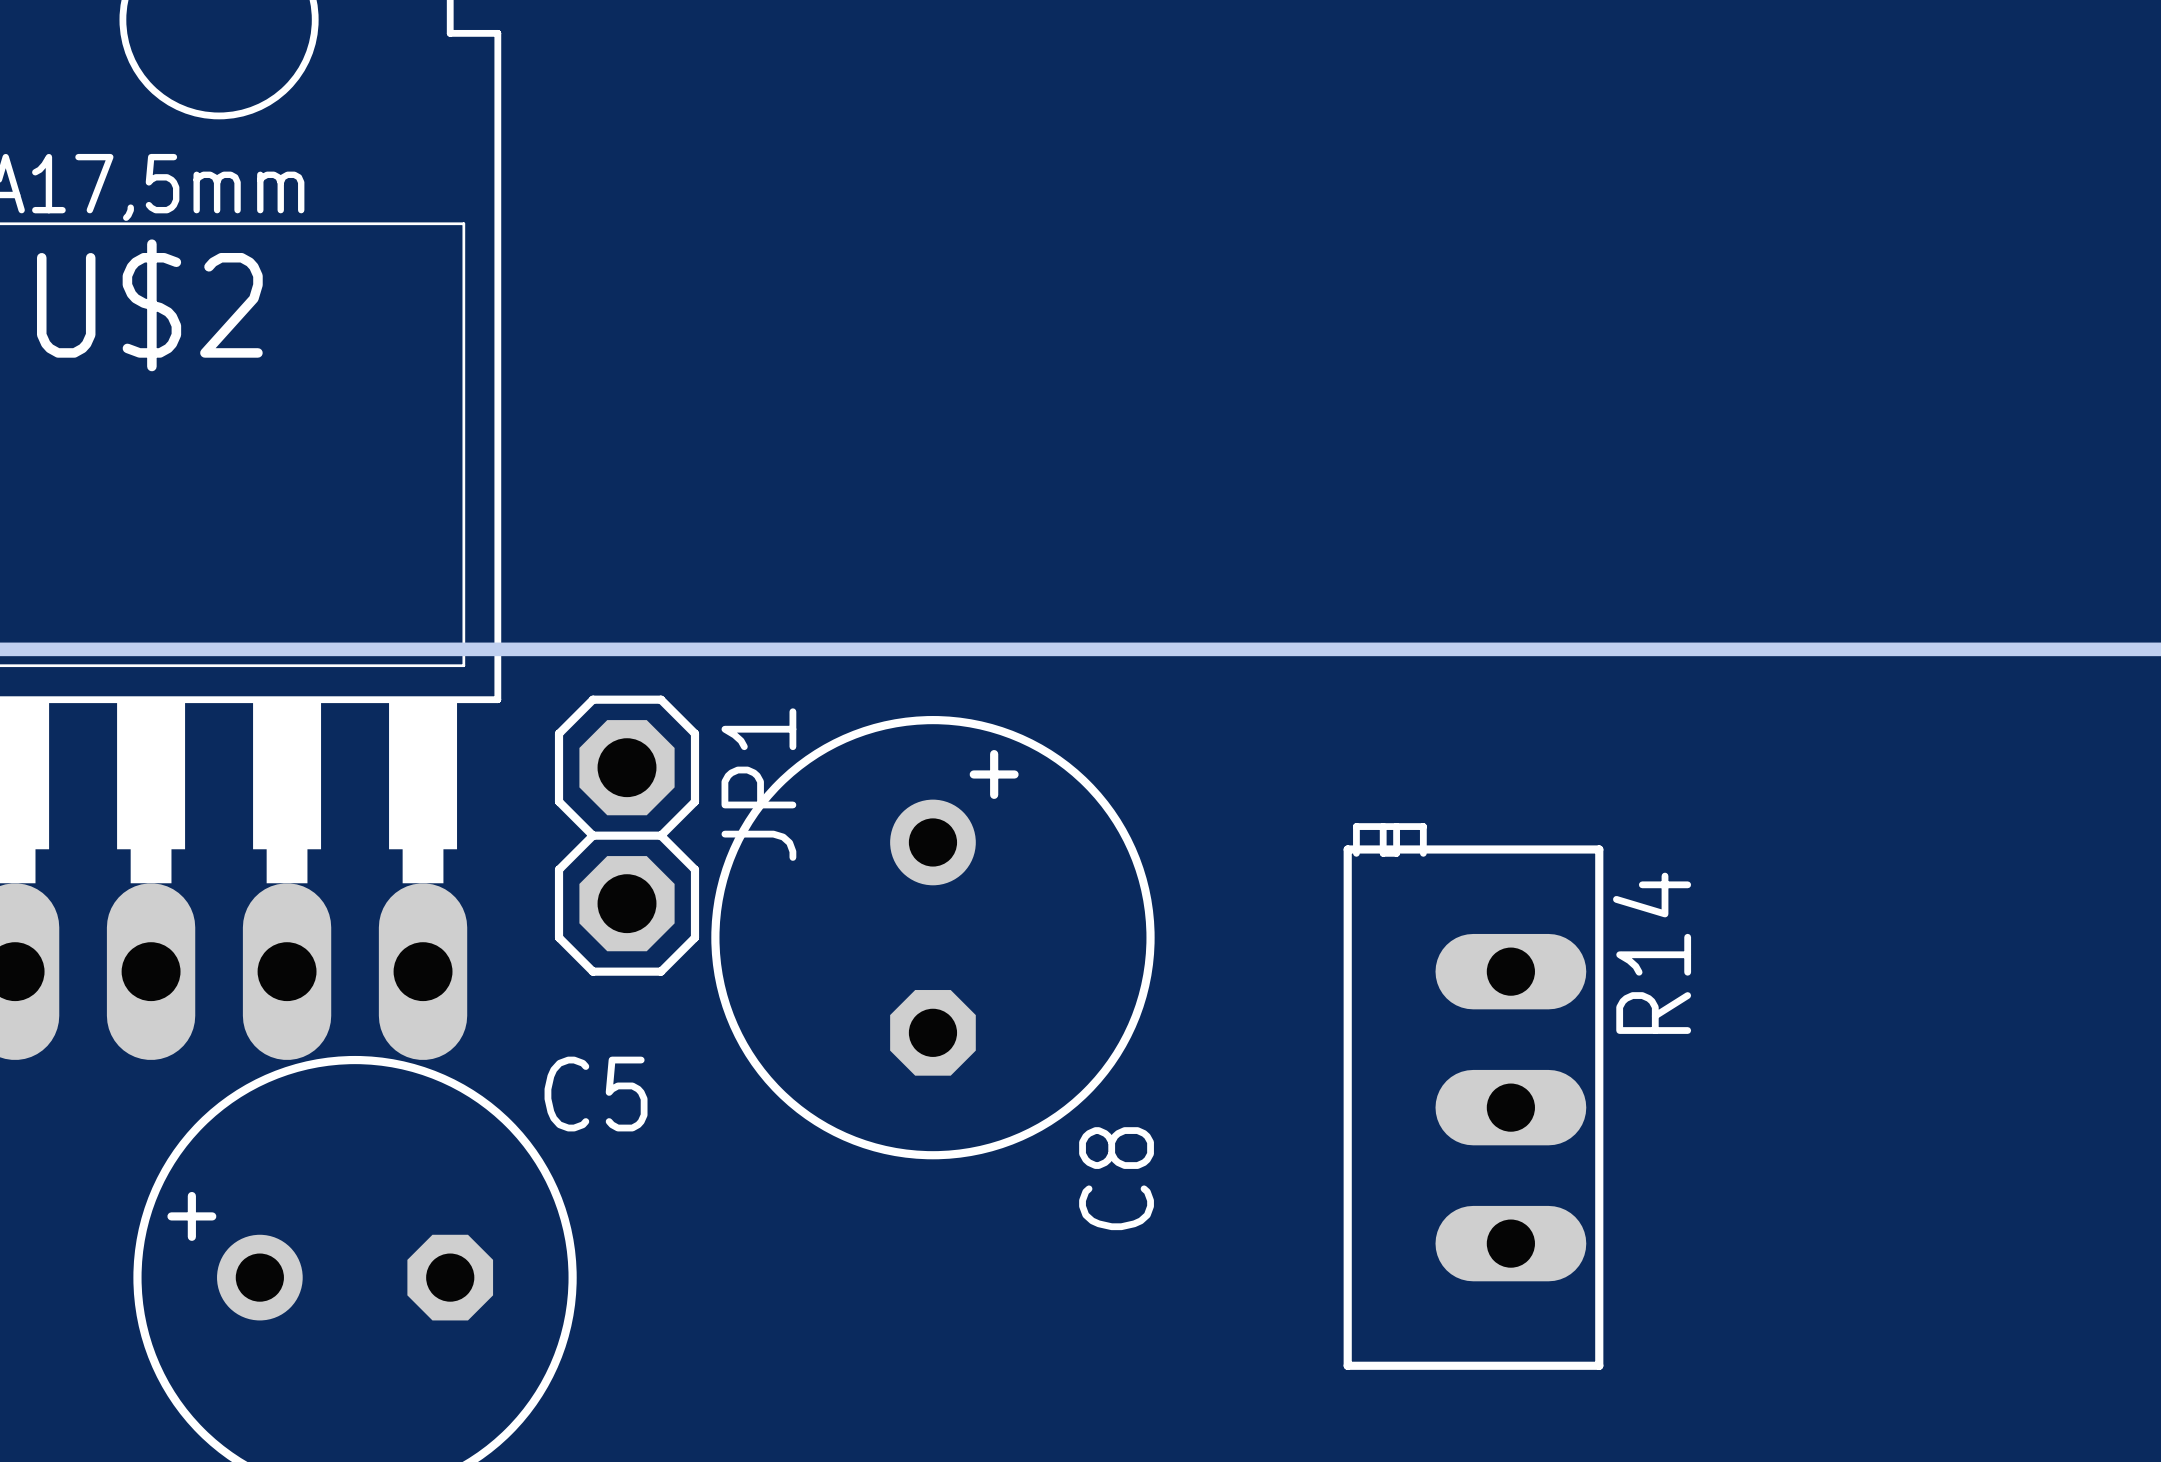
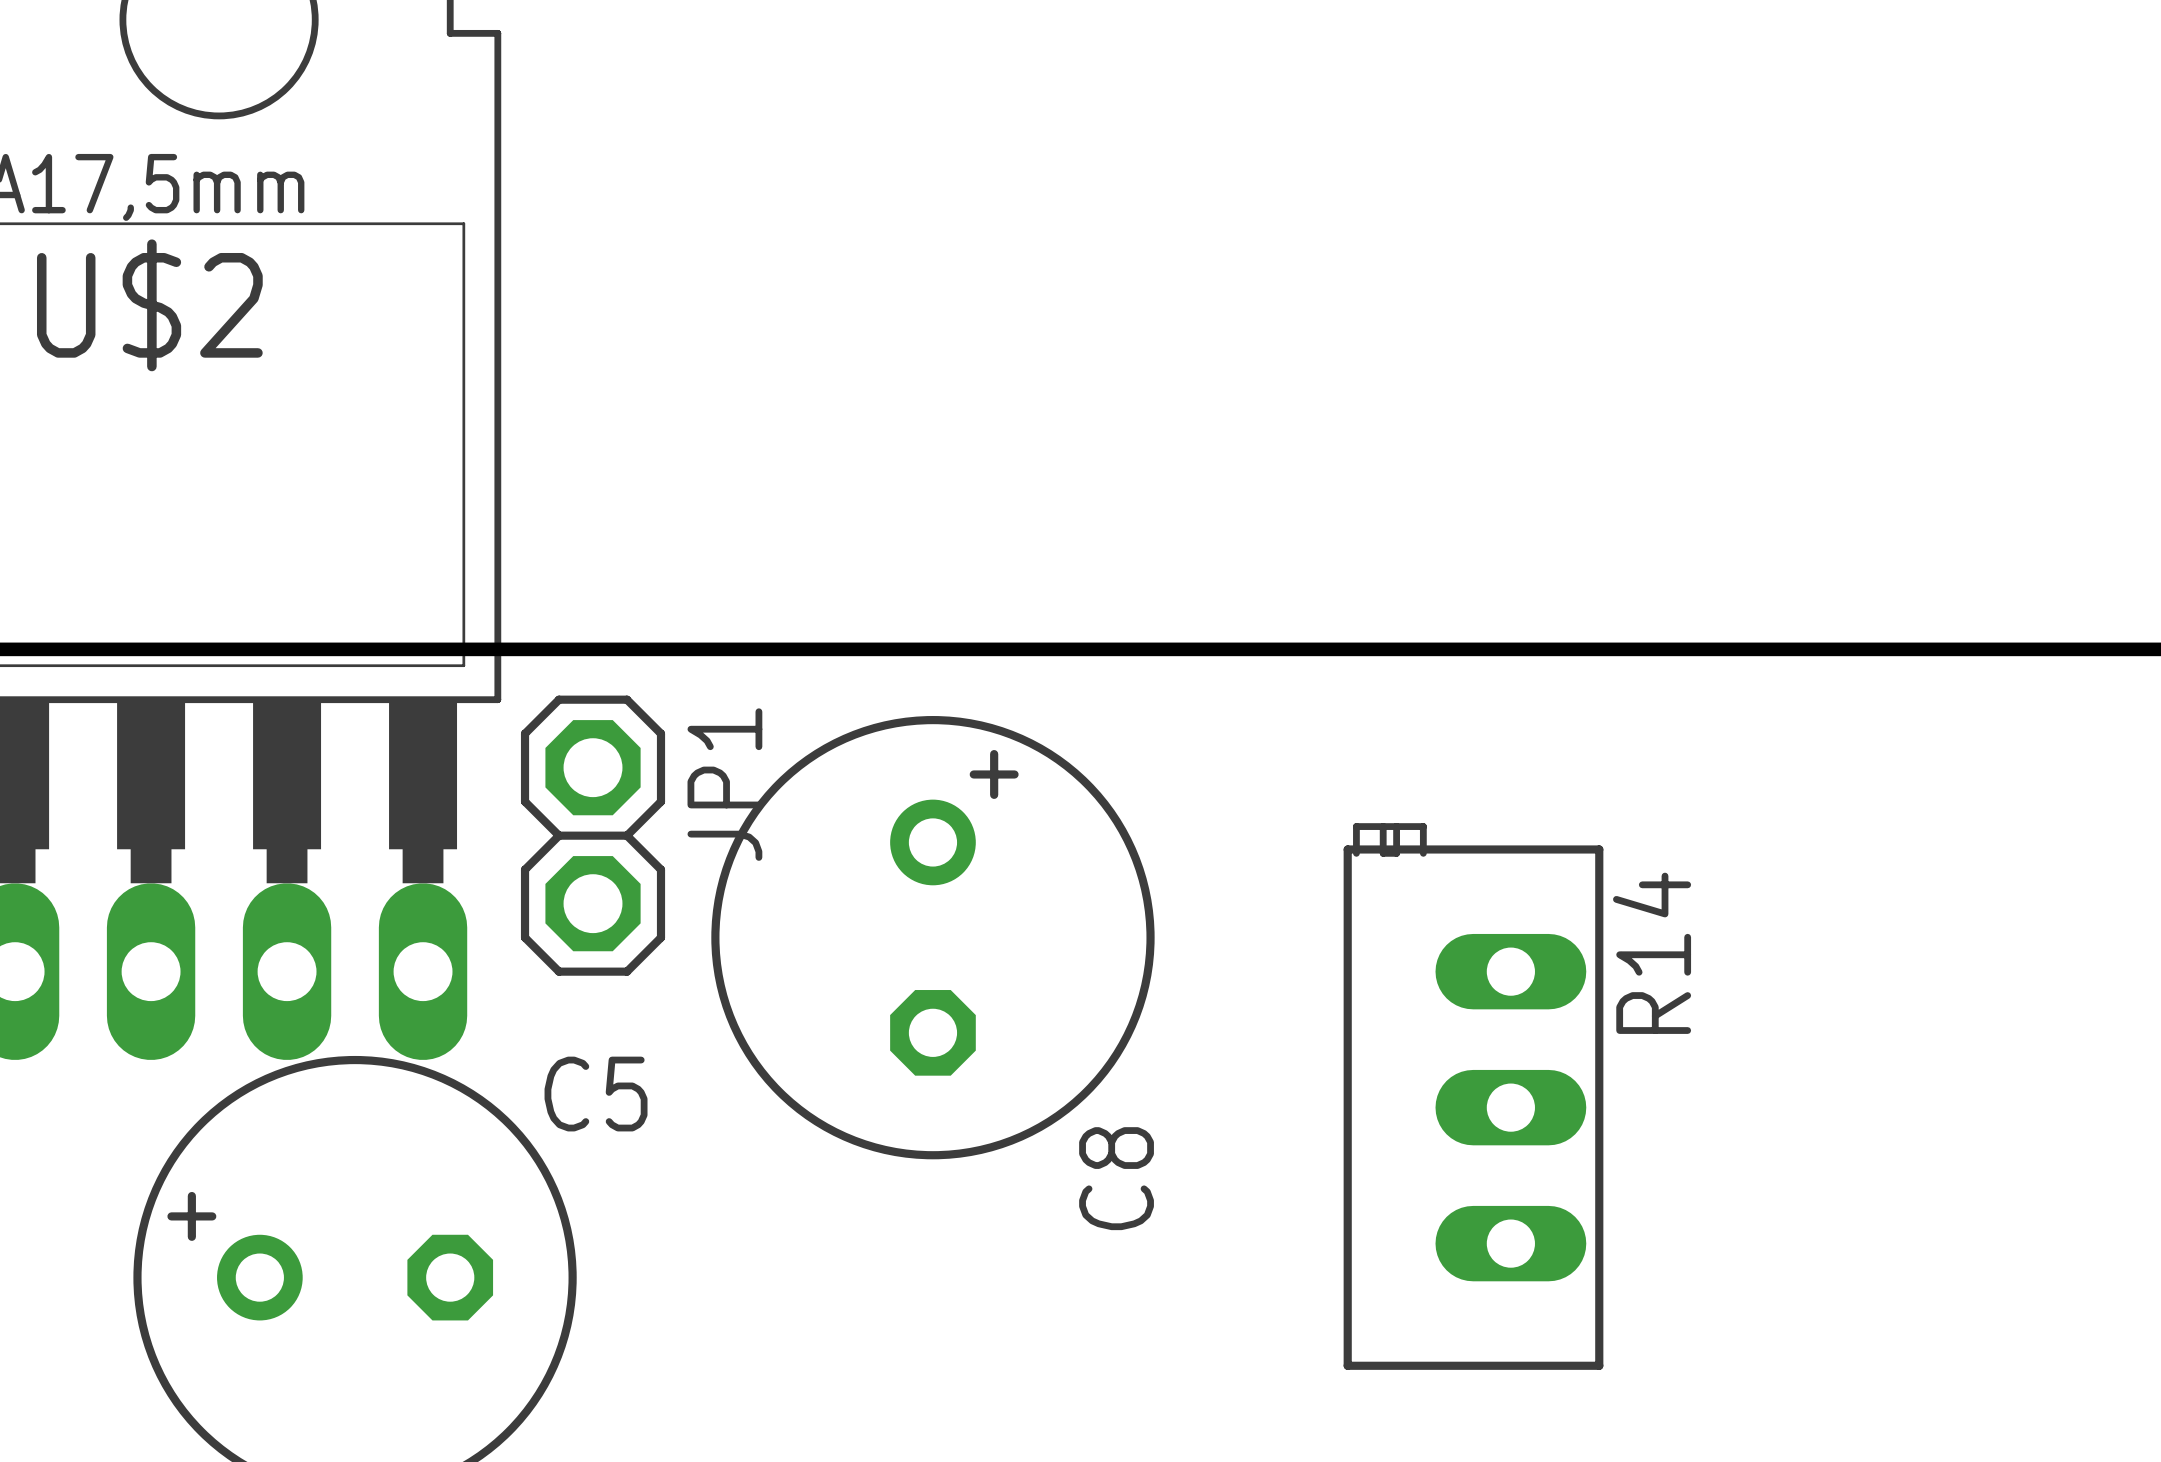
JP1 position: (627, 835) -> (593, 835)

